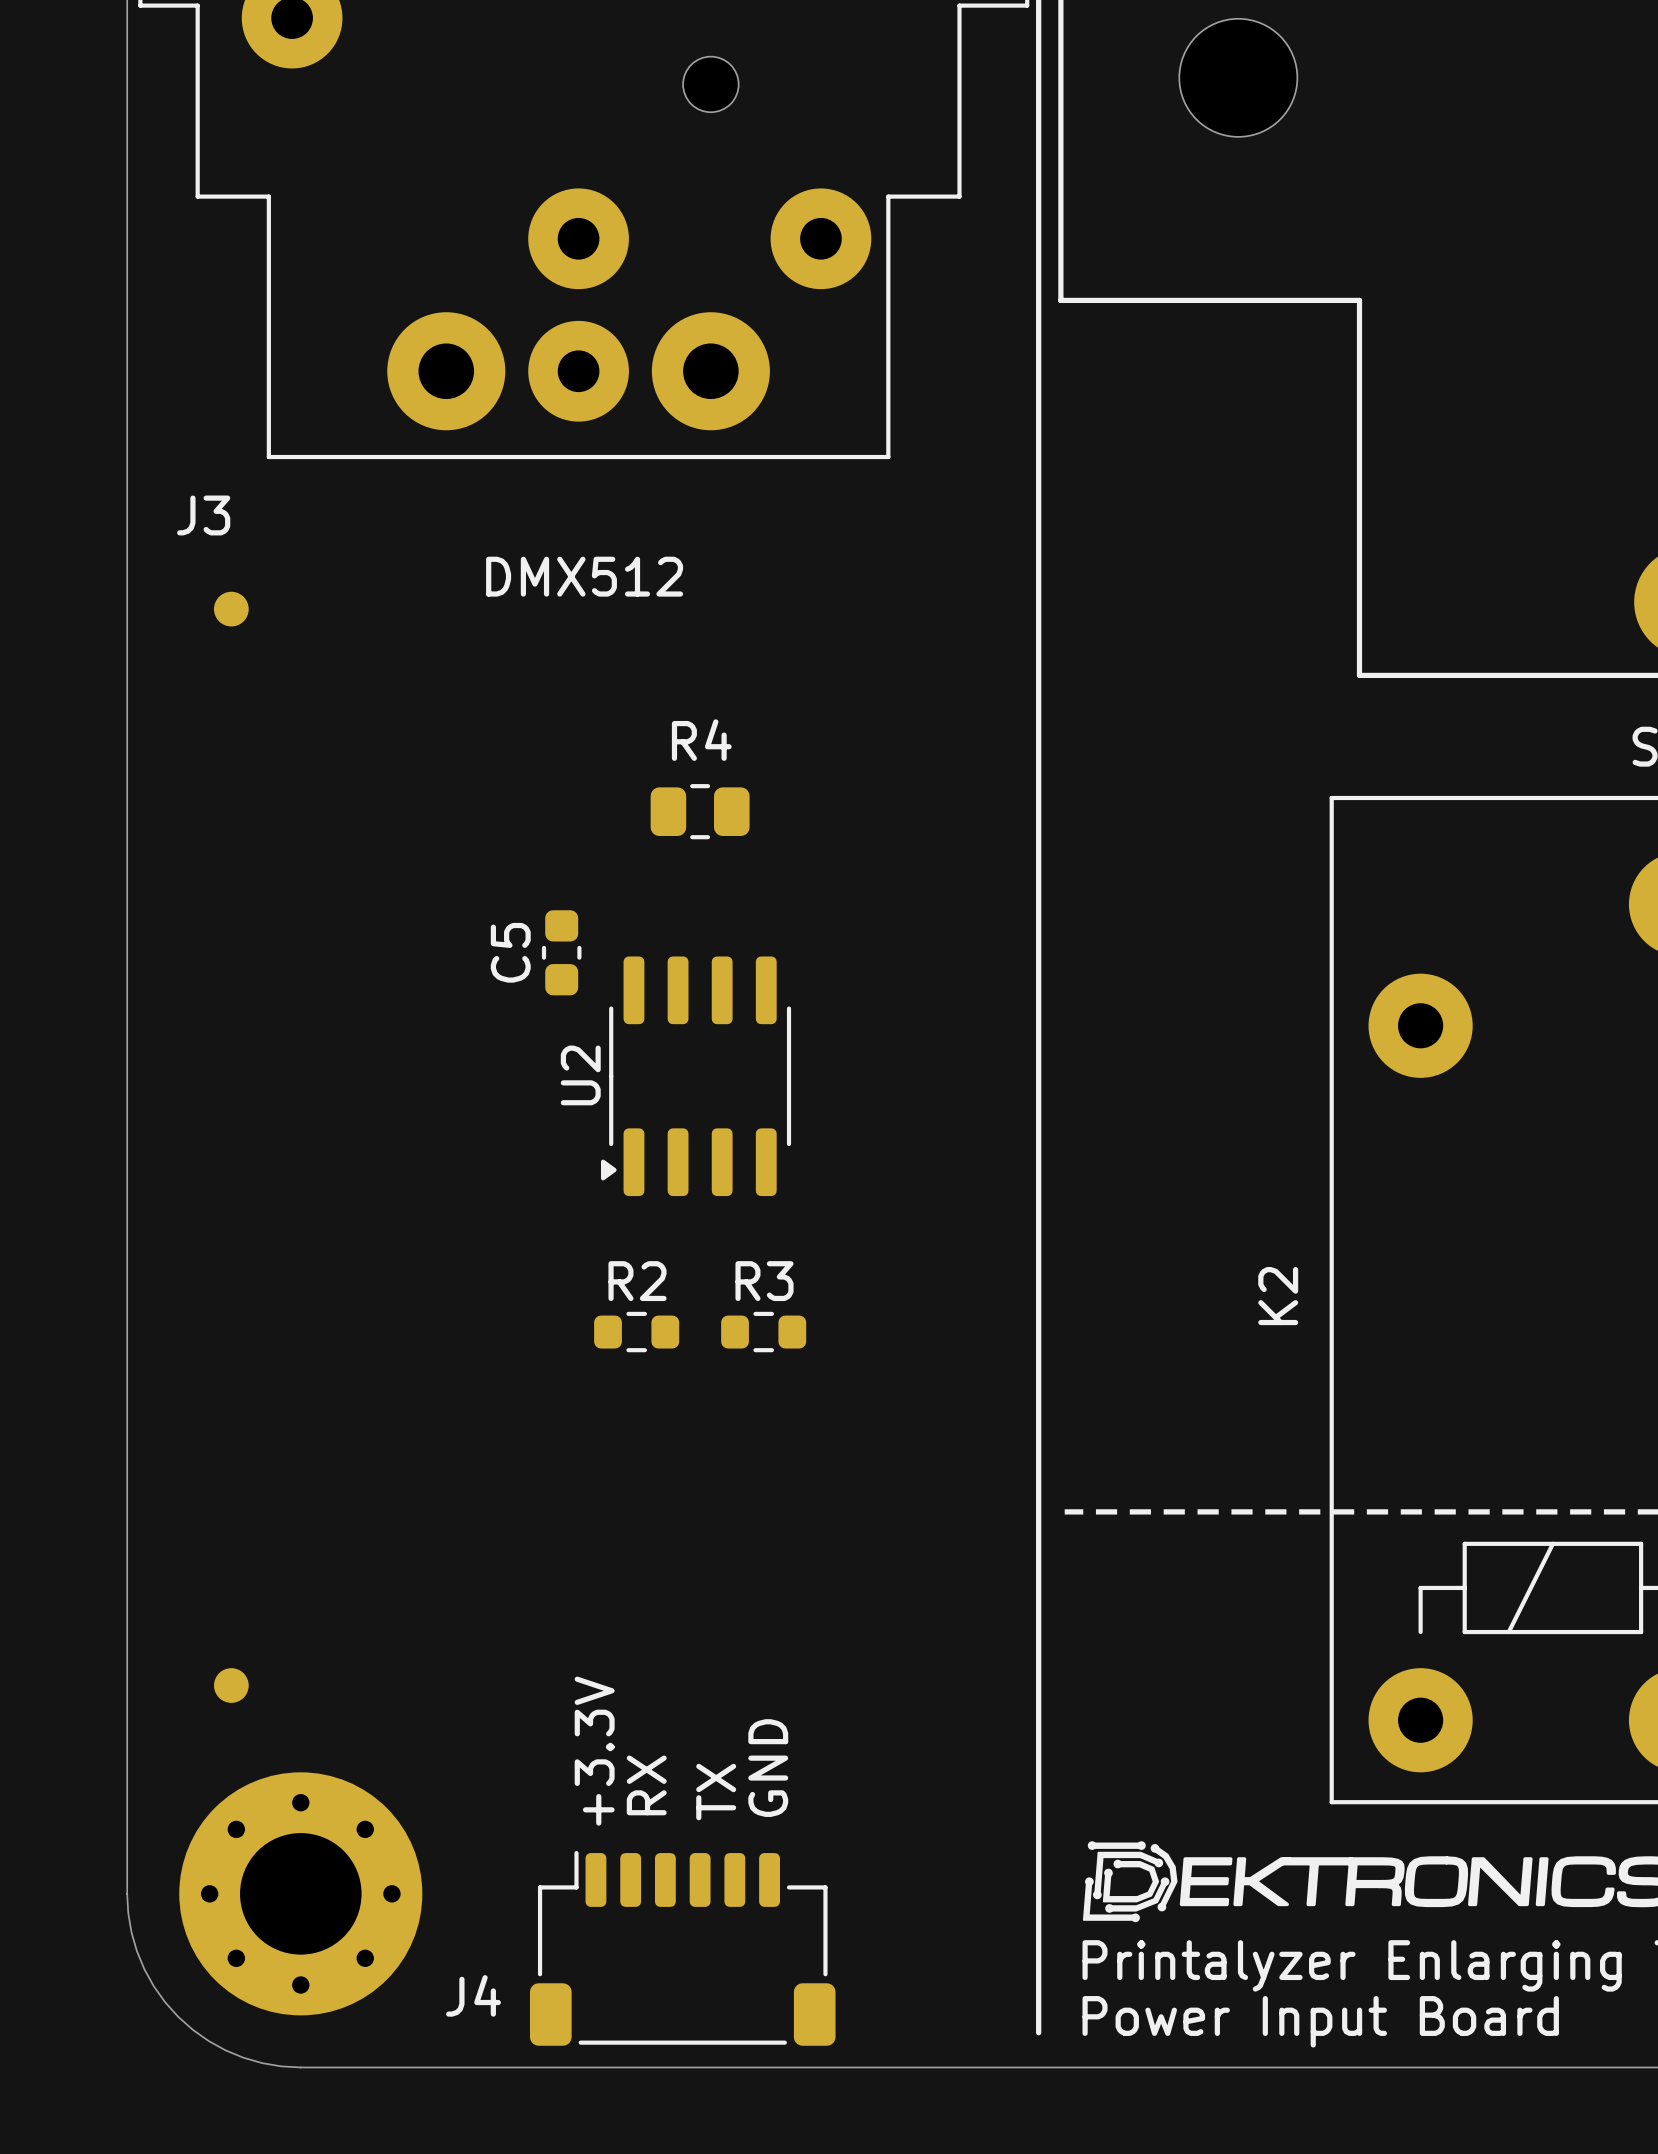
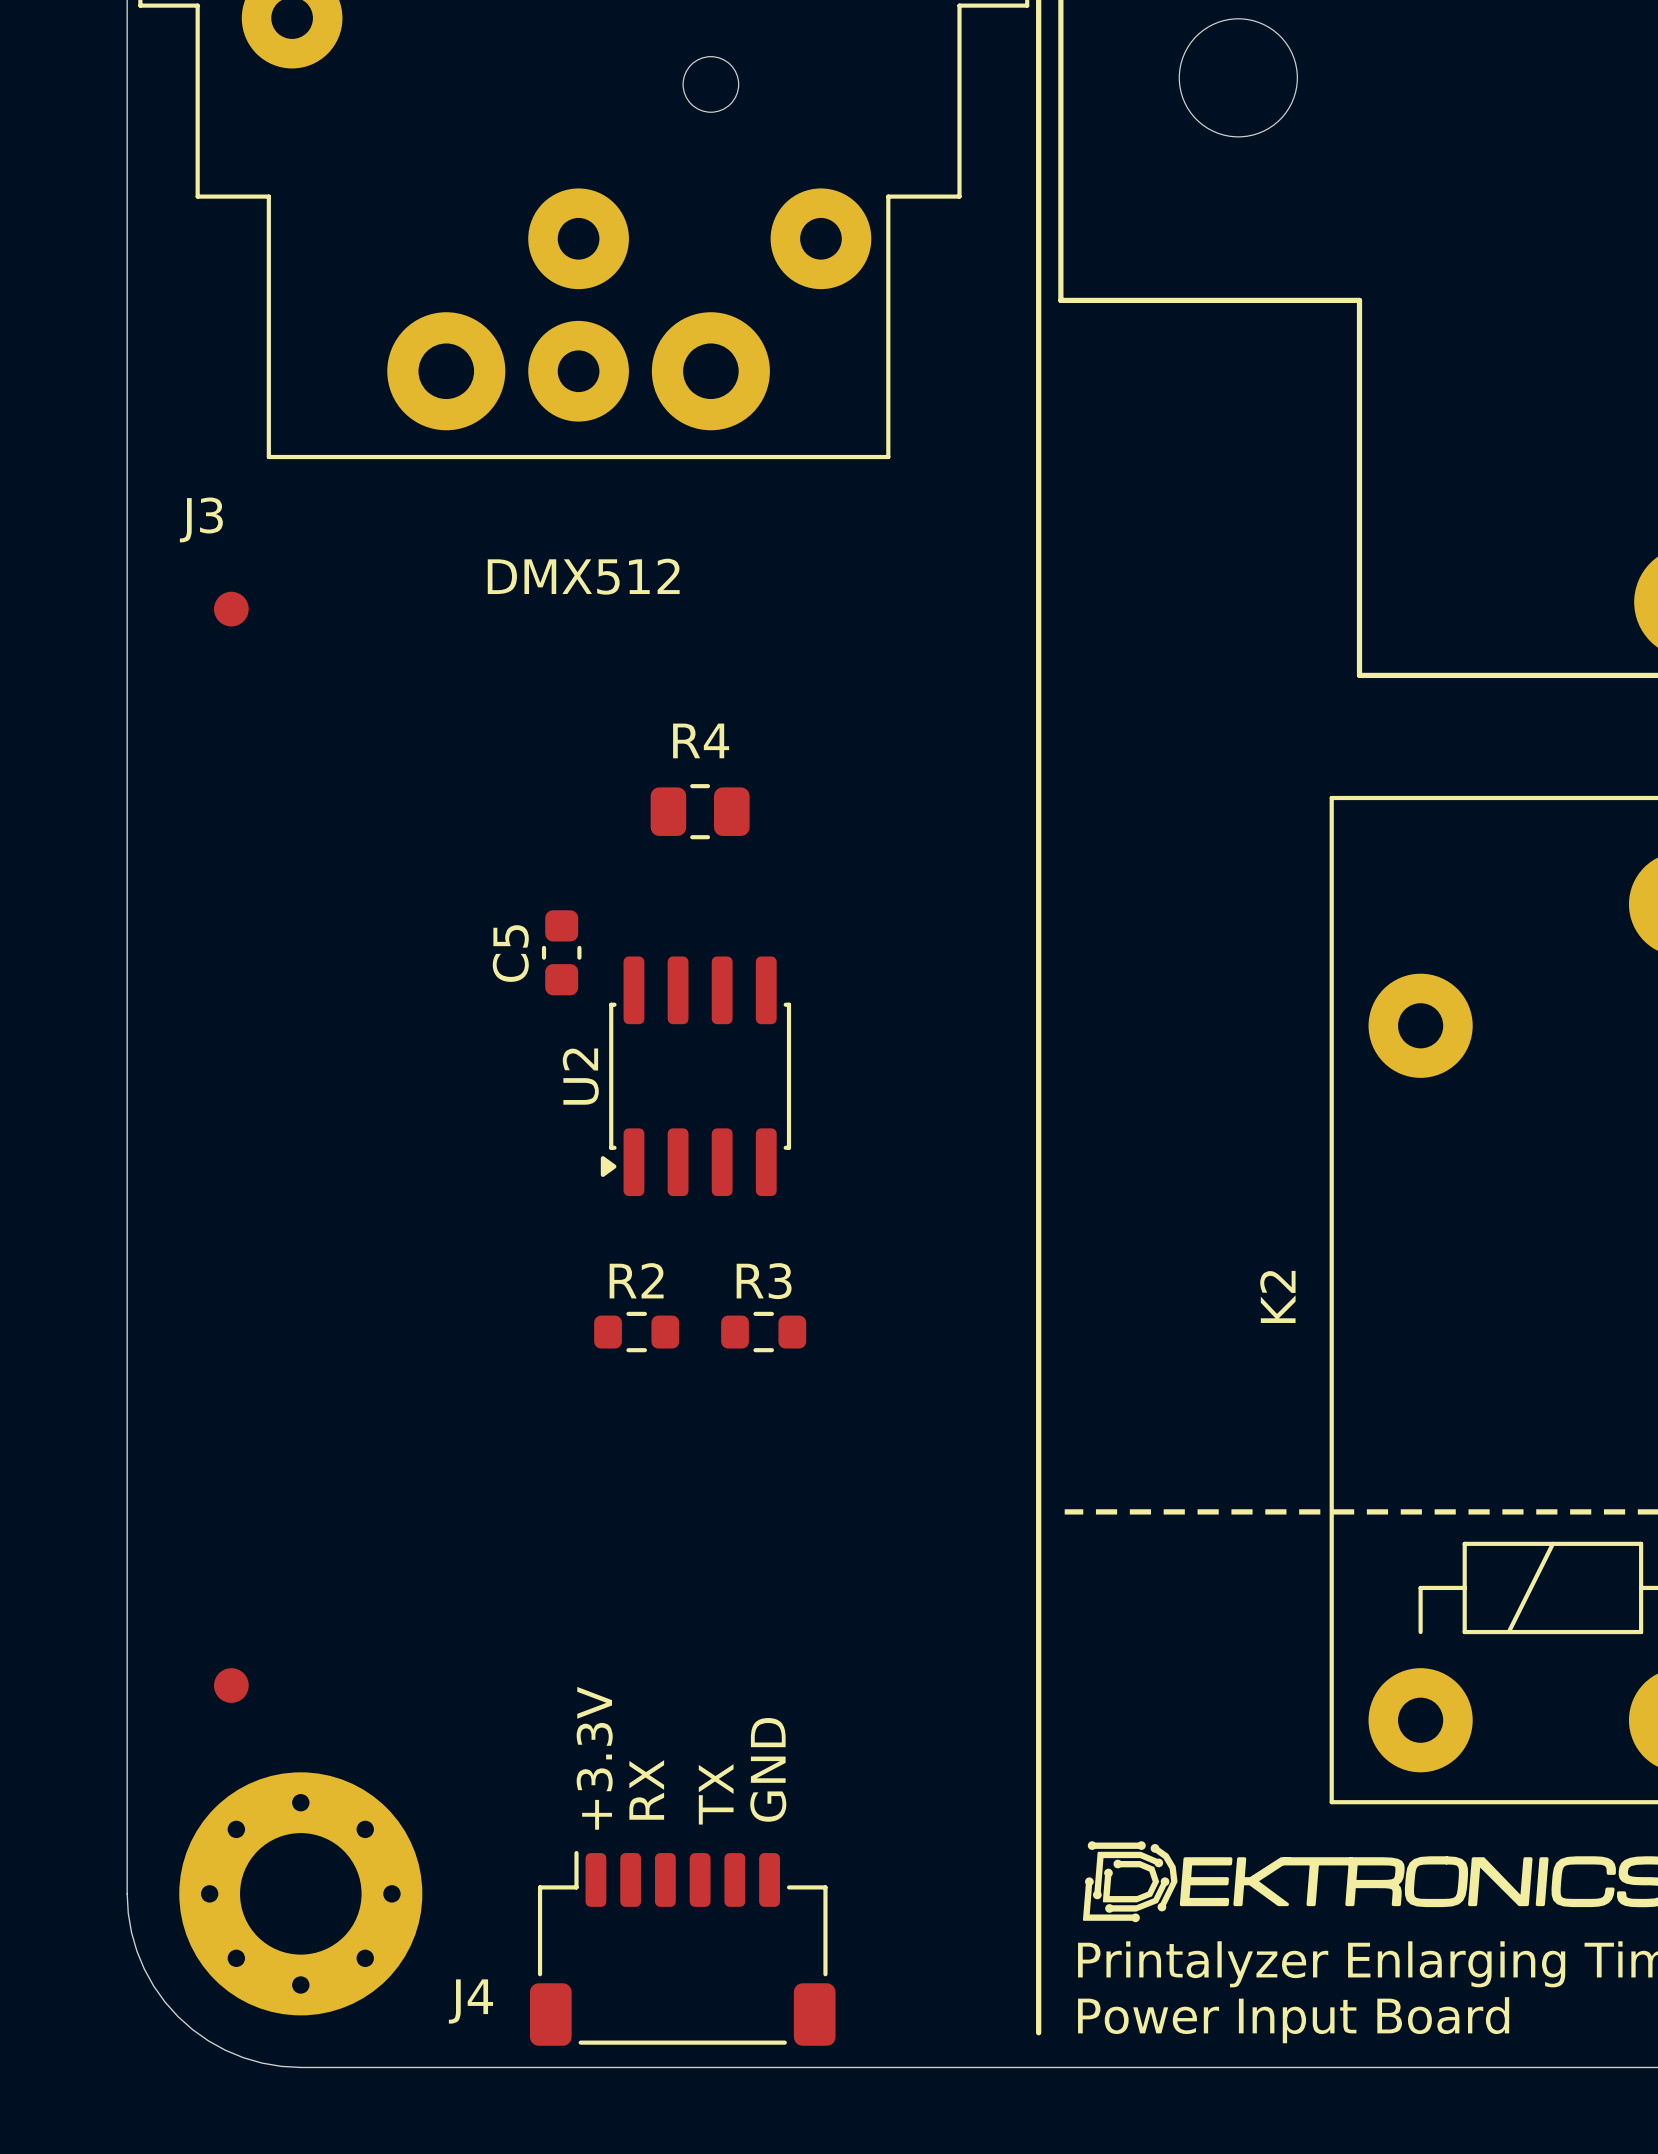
U2 footprint: [600, 956, 792, 1197] -> [600, 956, 792, 1197]

